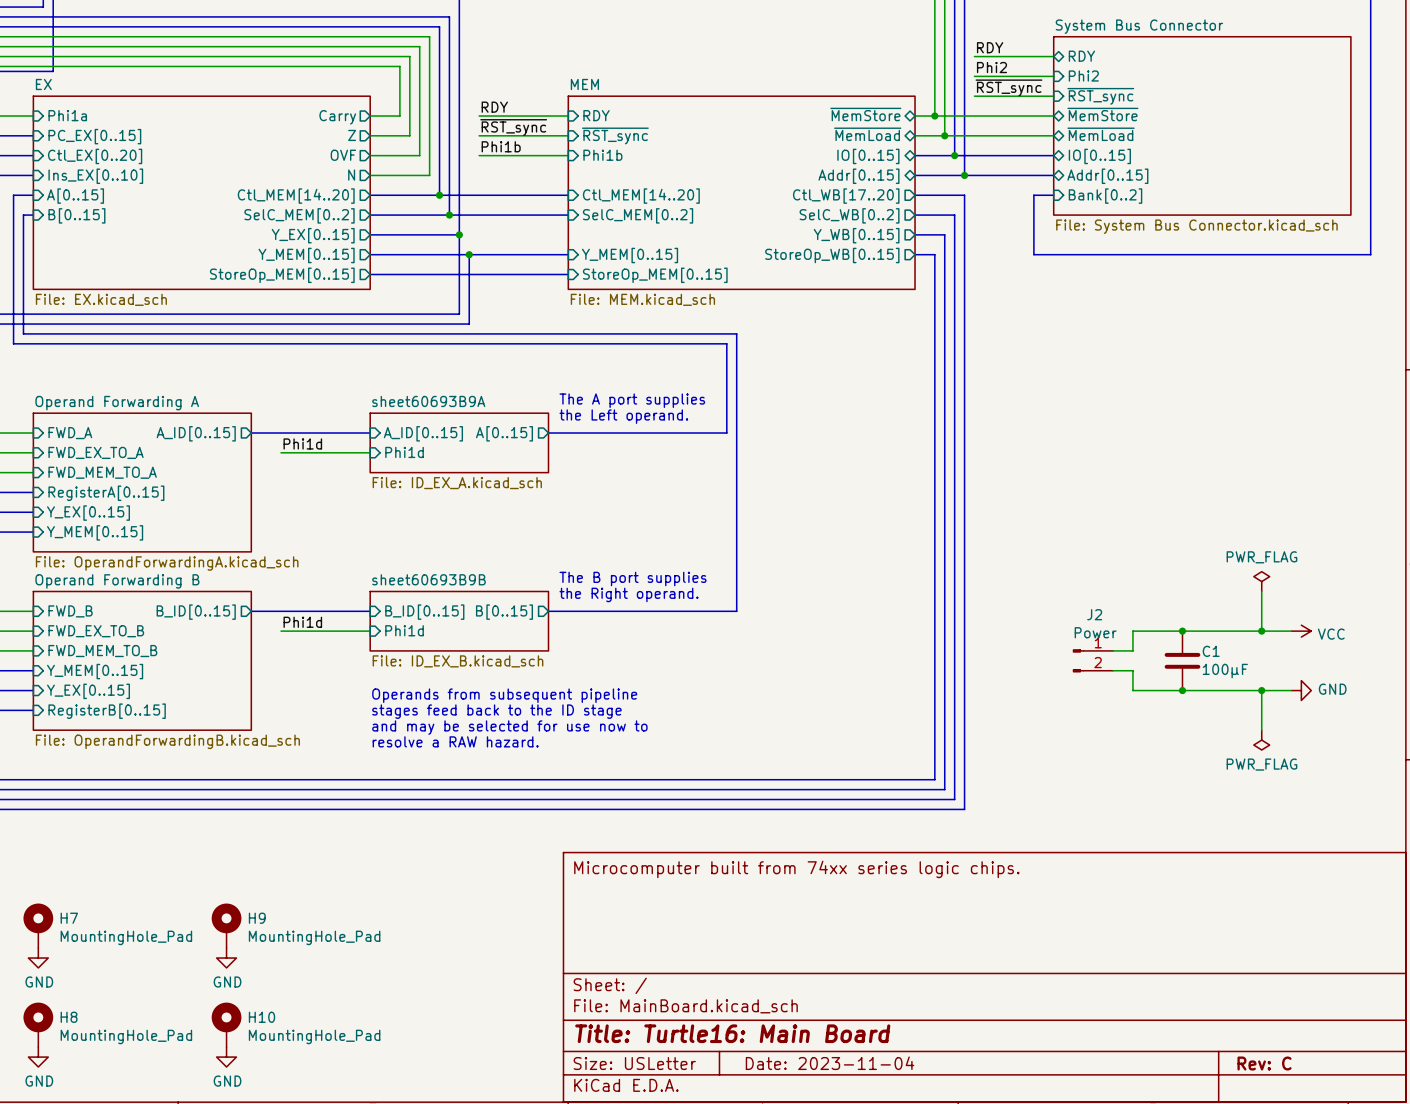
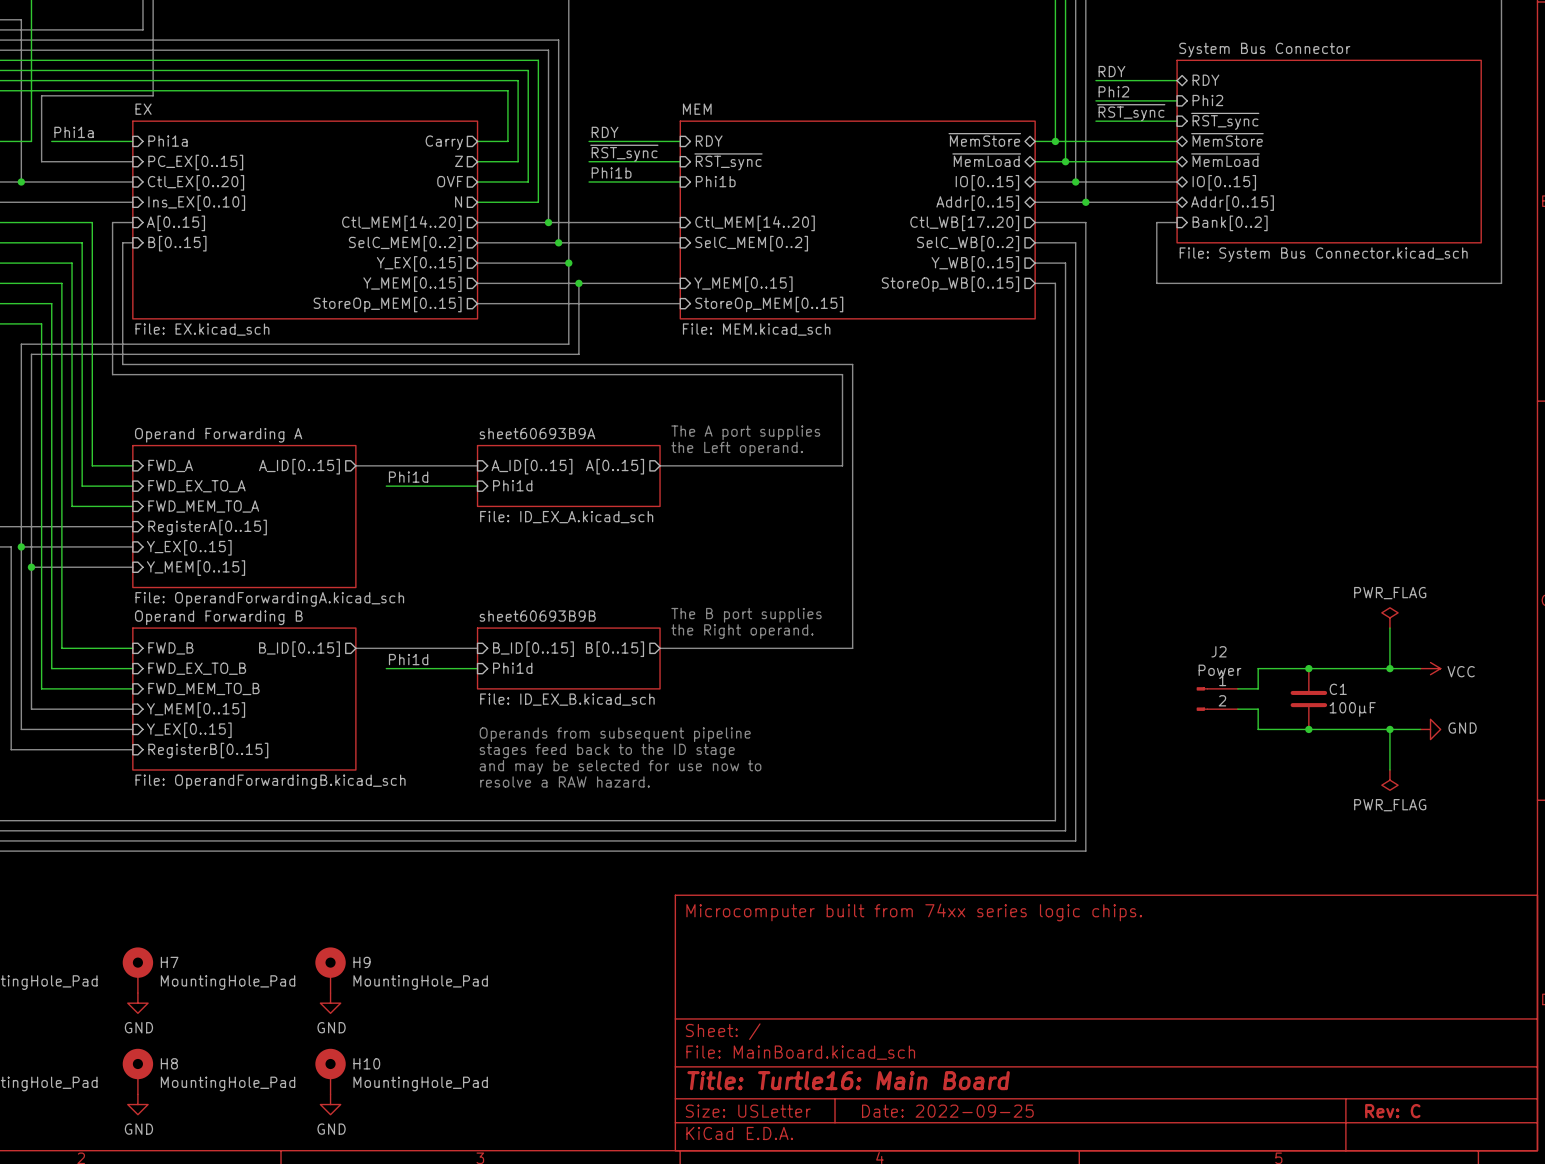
title block: Date: 2023-11-04 (830, 1063) -> Date: 2022-09-25 (947, 1111)

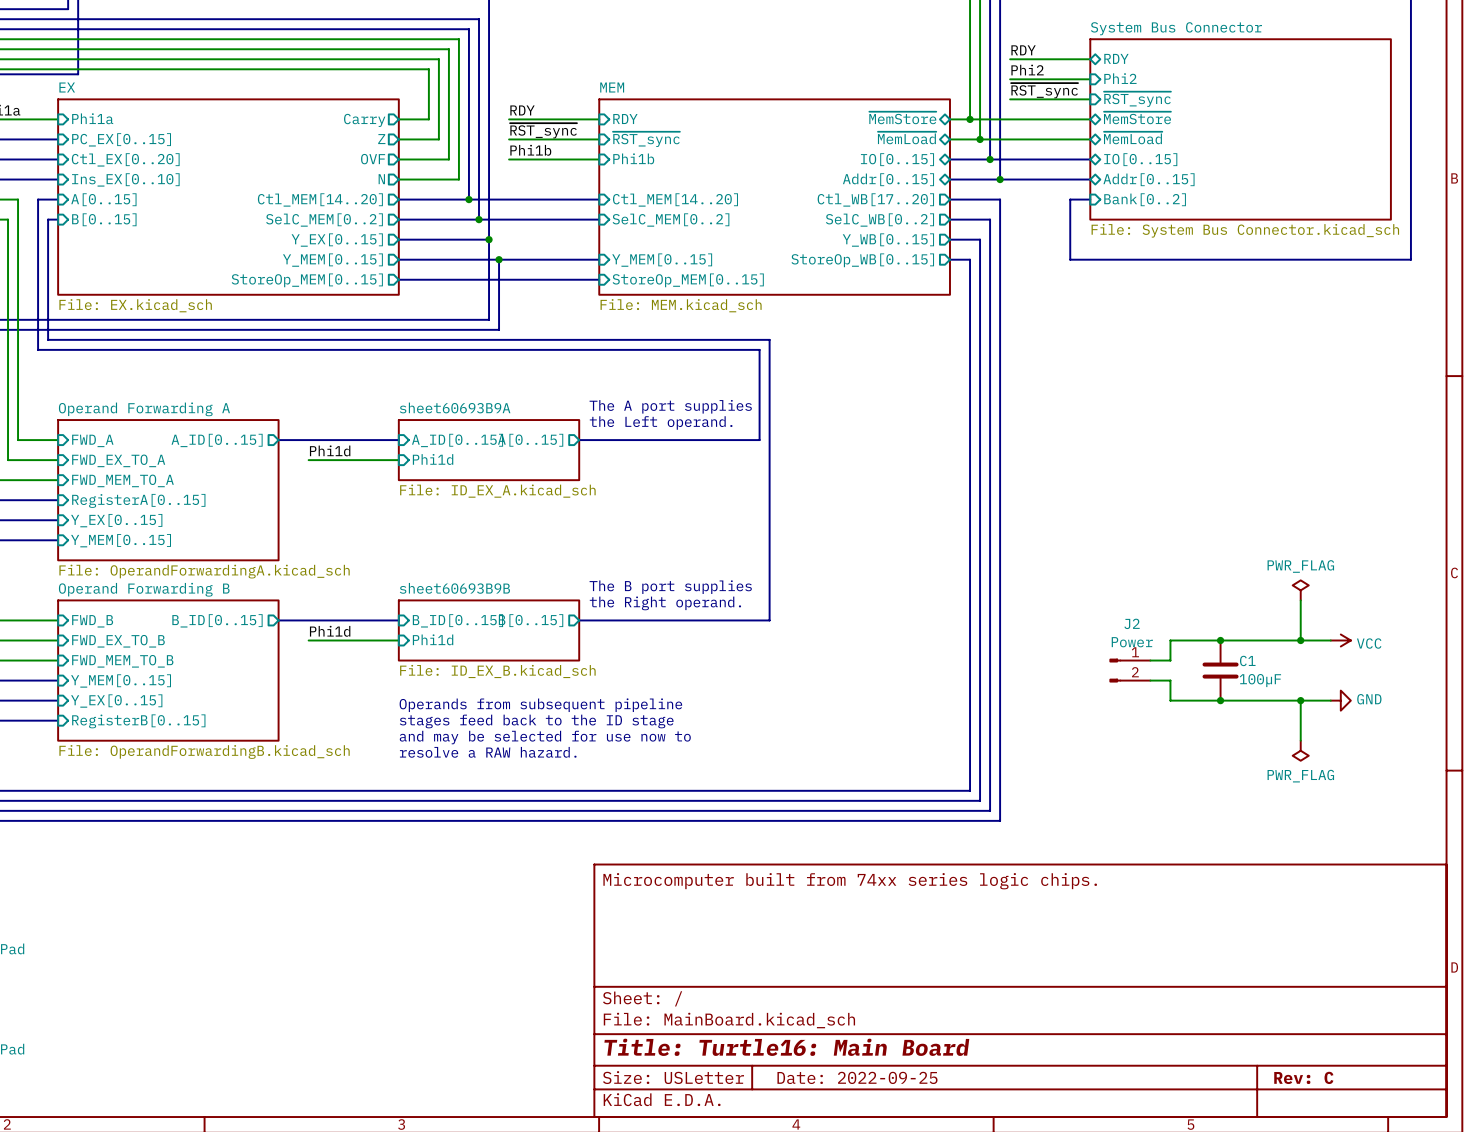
H7: MountingHole_Pad (137, 970) -> none
H9: MountingHole_Pad (330, 970) -> none
power symbol: GND (137, 1003) -> none
power symbol: GND (330, 1003) -> none
H8: MountingHole_Pad (137, 1071) -> none
H10: MountingHole_Pad (330, 1071) -> none
power symbol: GND (137, 1104) -> none
power symbol: GND (330, 1104) -> none

